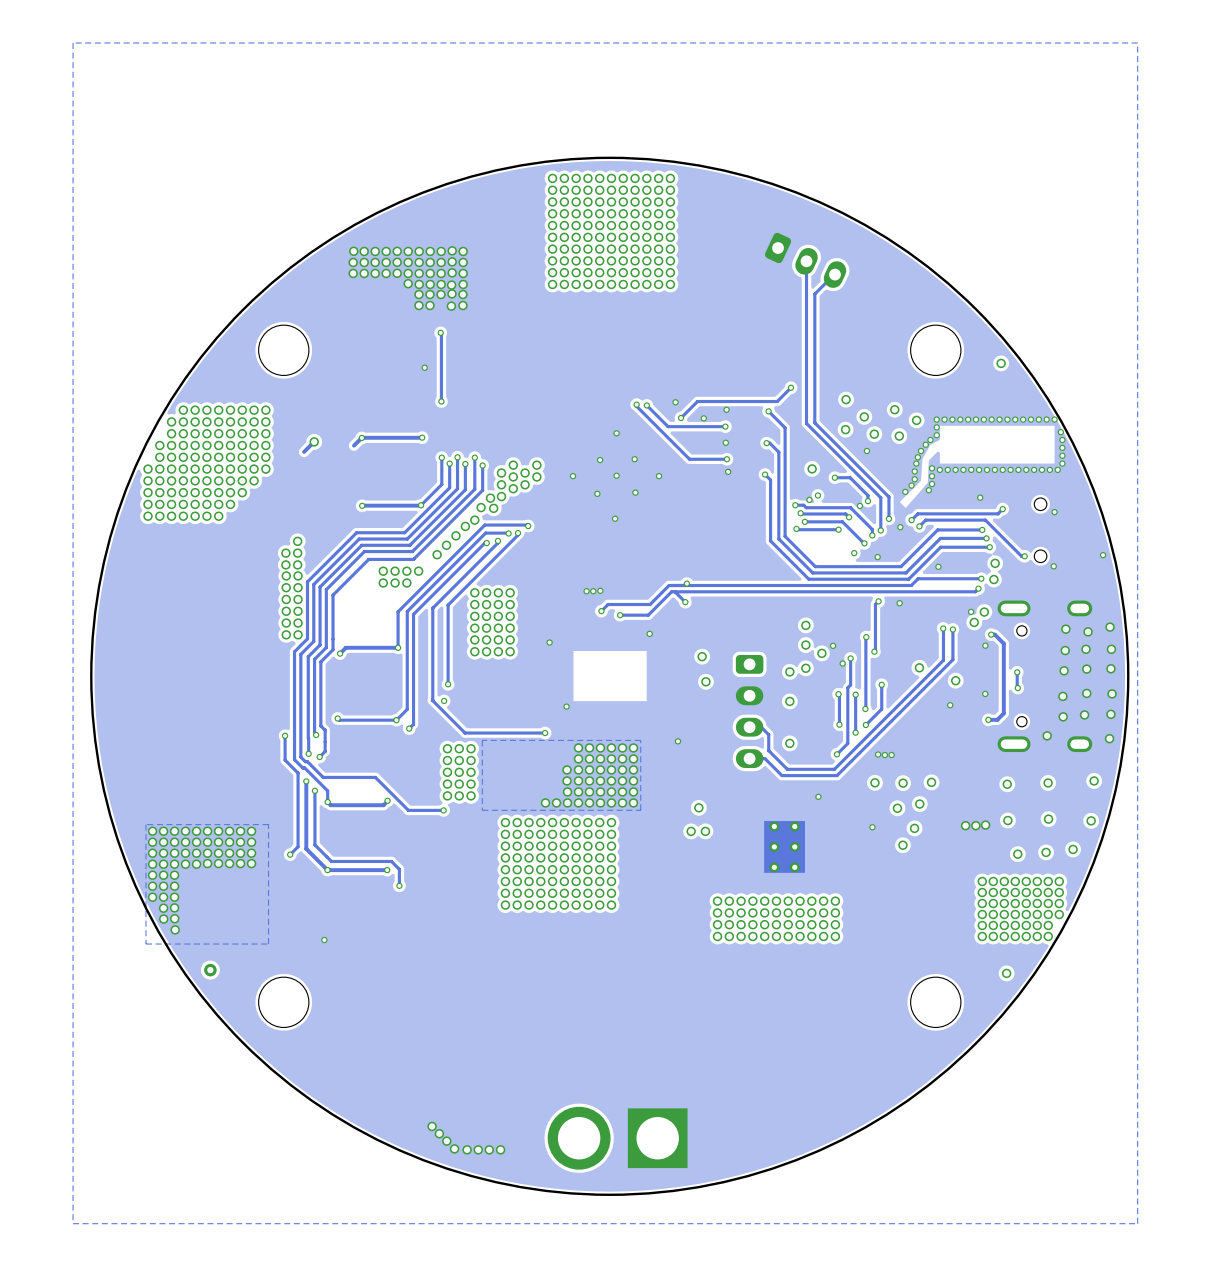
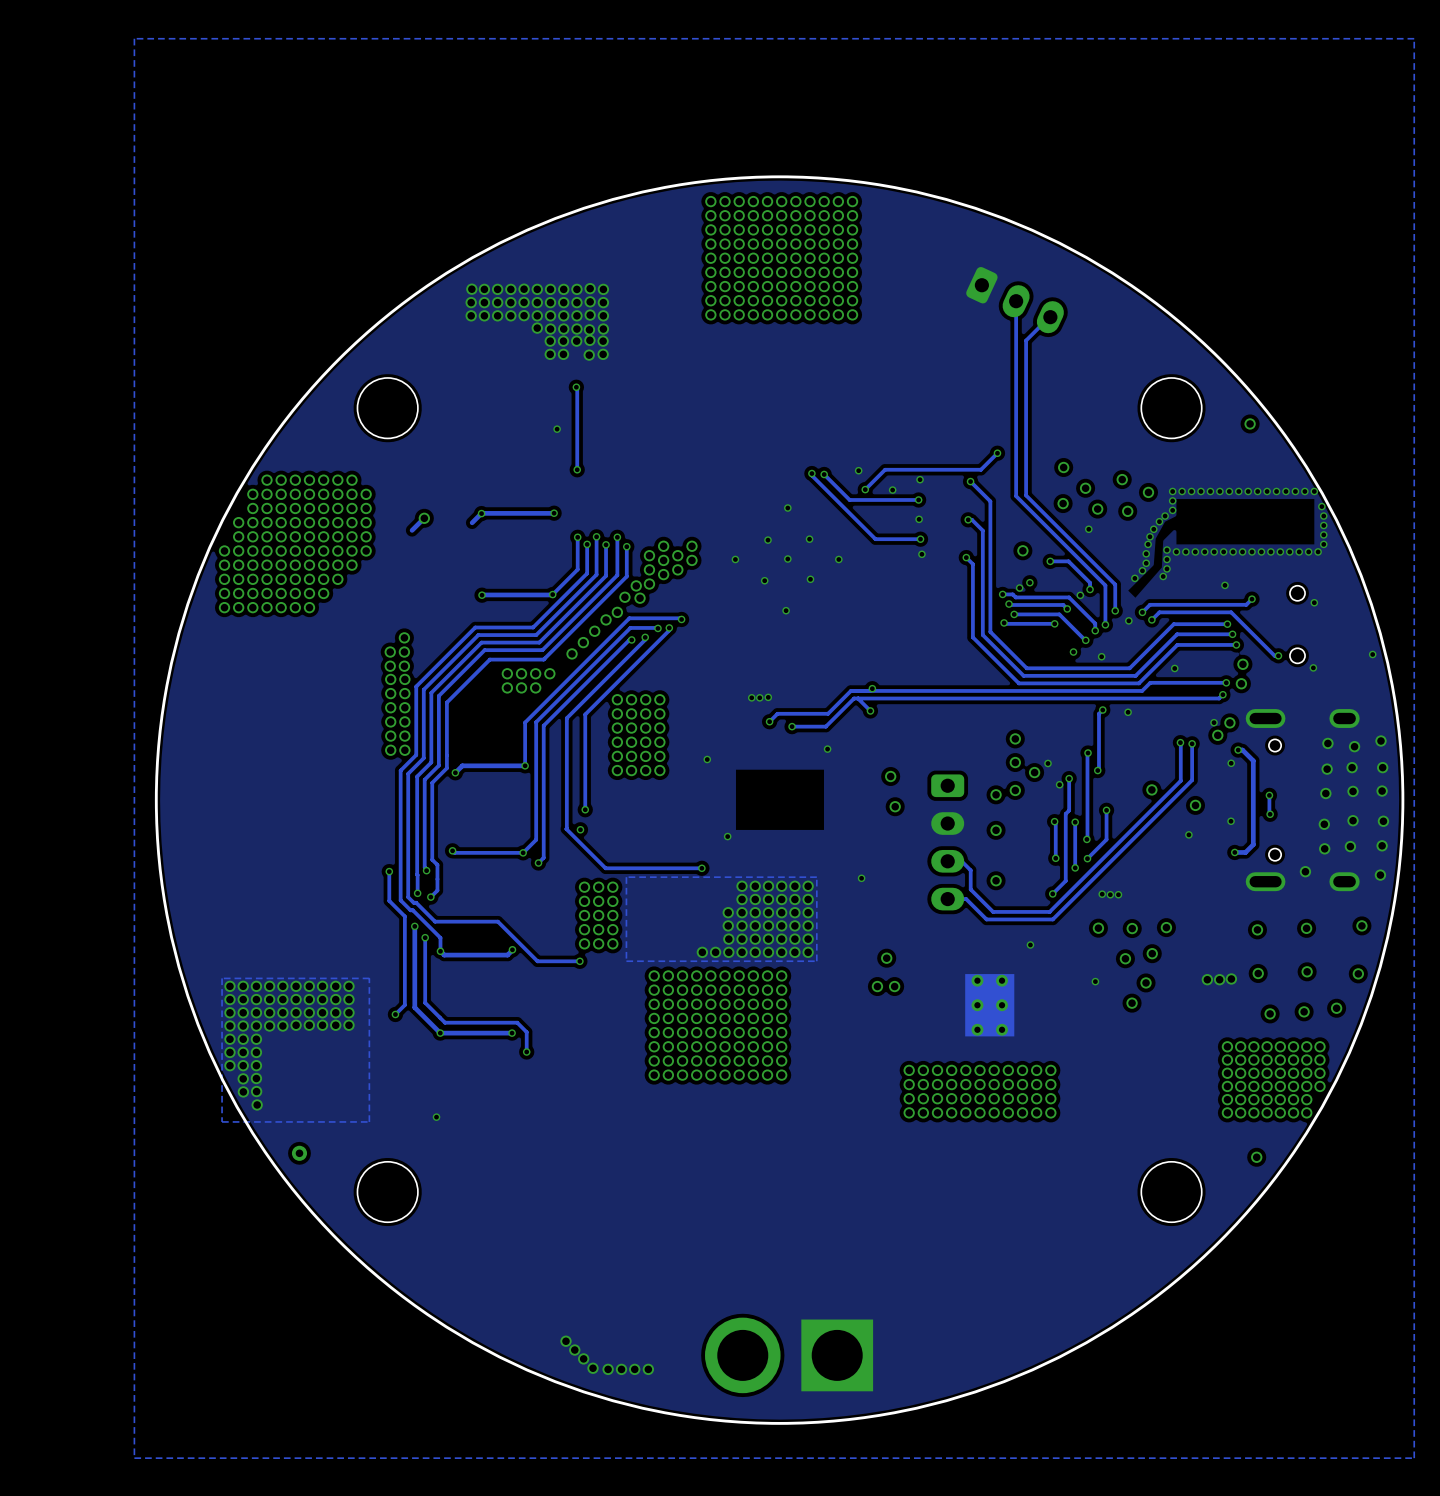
via: (552, 284) -> none
via: (564, 284) -> none
via: (576, 284) -> none
via: (587, 284) -> none
via: (599, 284) -> none
via: (611, 284) -> none
via: (623, 284) -> none
via: (635, 284) -> none
via: (646, 284) -> none
via: (658, 284) -> none
via: (670, 284) -> none
via: (265, 410) -> none

